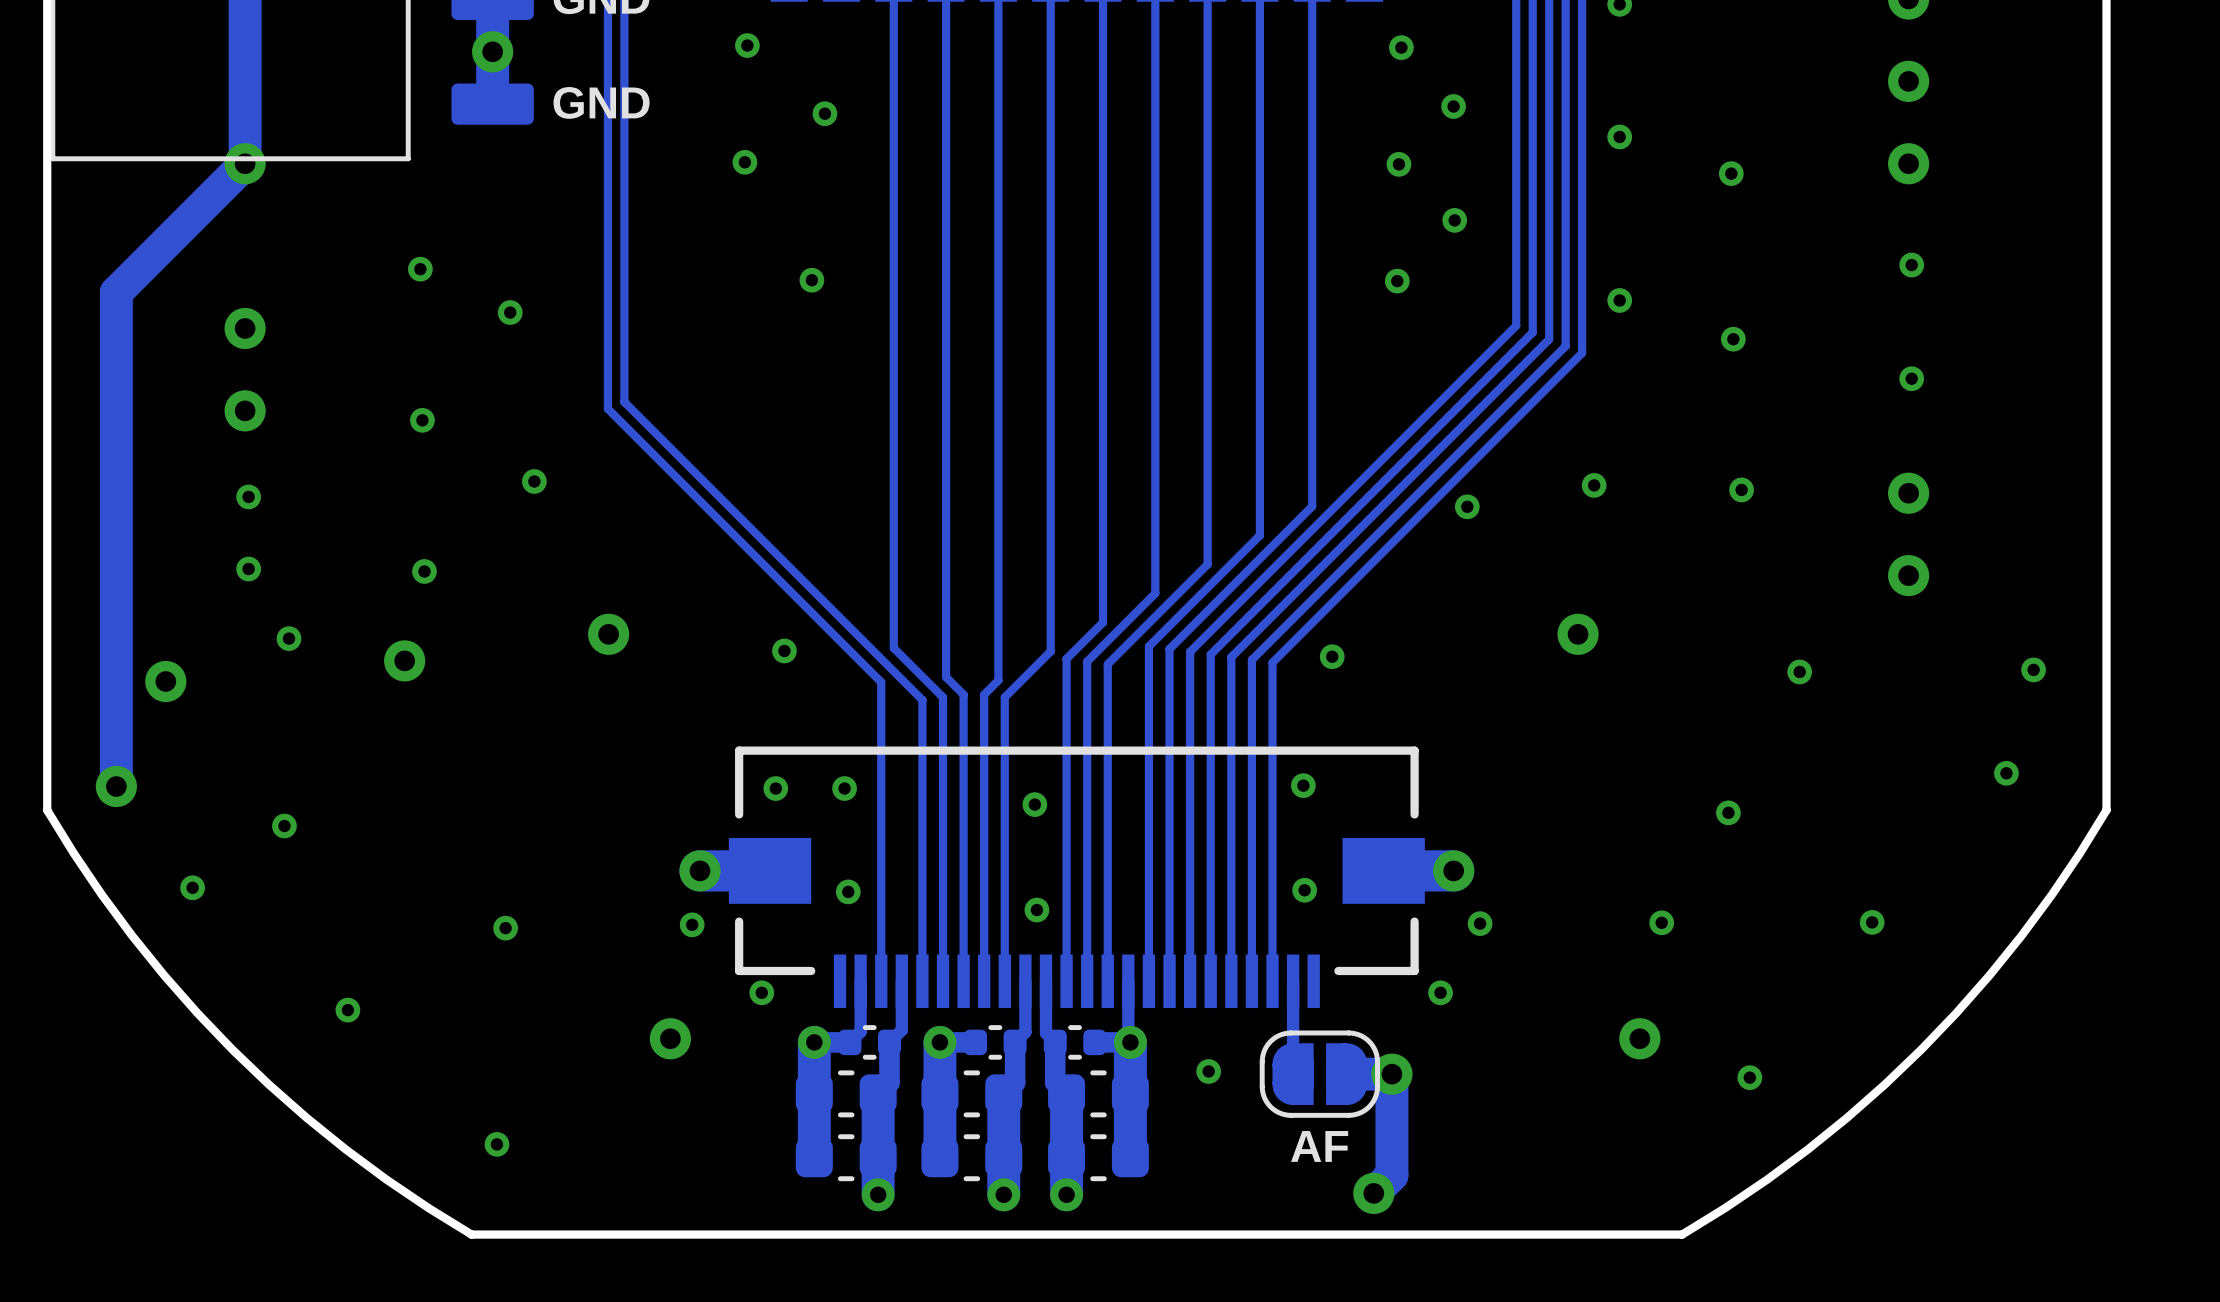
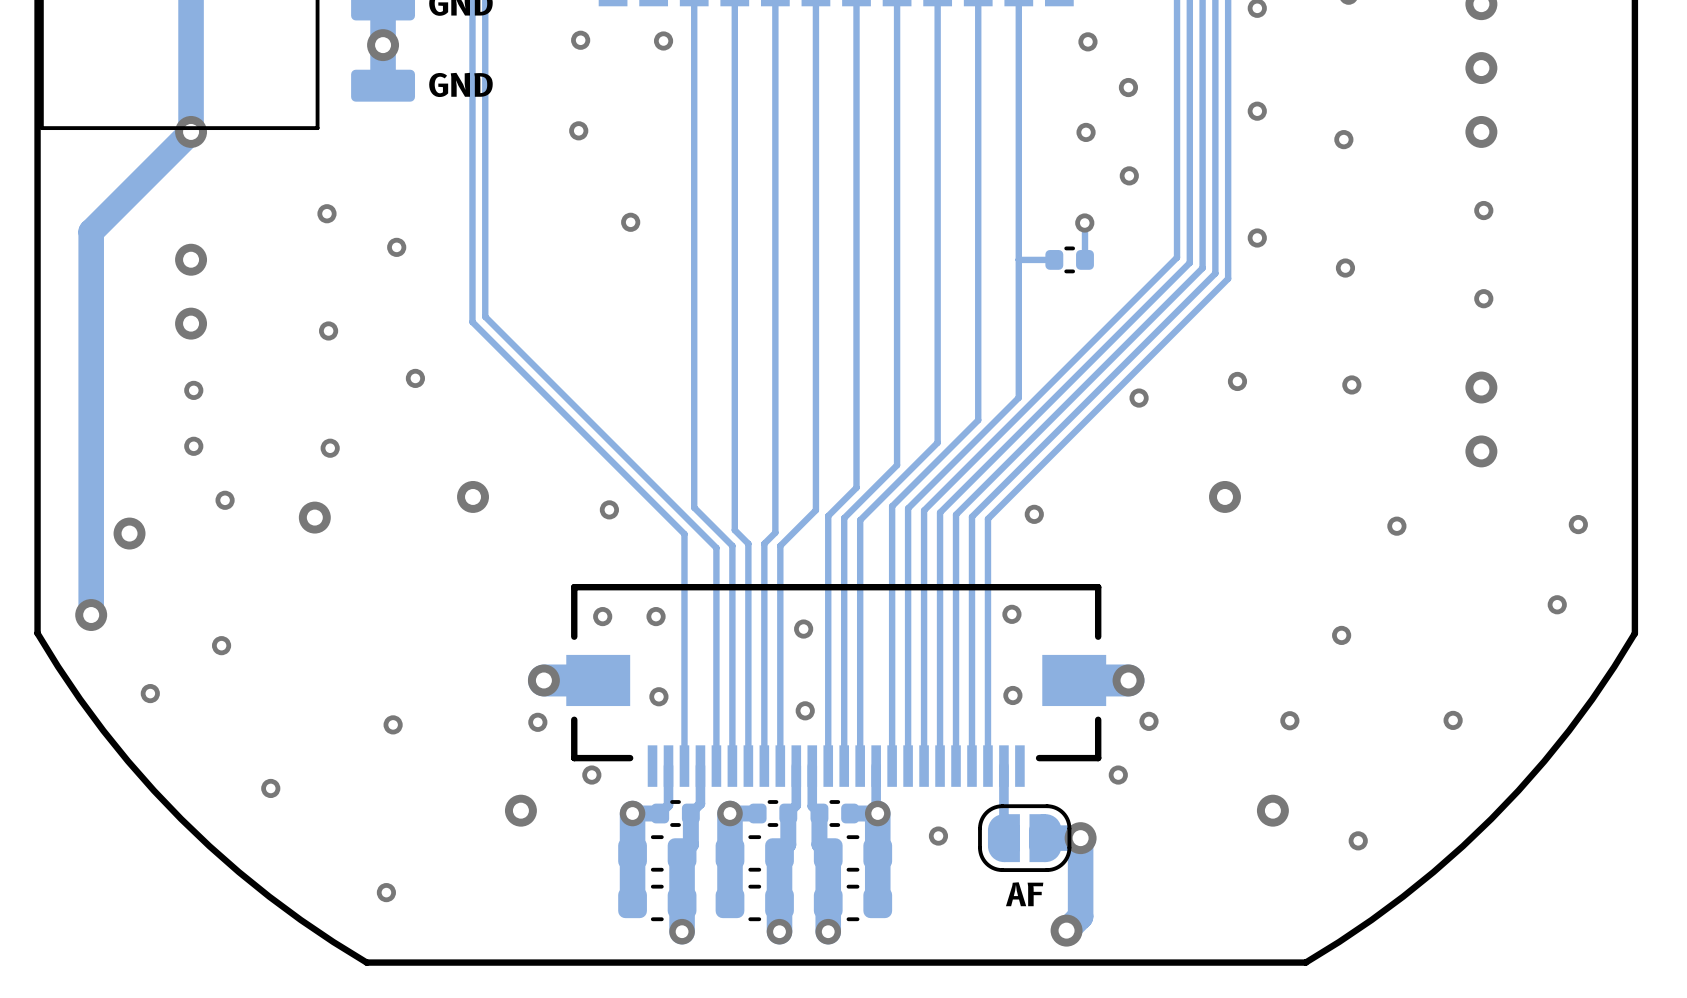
via position: (824, 113) -> (663, 40)
track: none -> (1084, 223) (1084, 259)
track: none -> (1054, 259) (1018, 259)
part: none -> (1069, 259)

